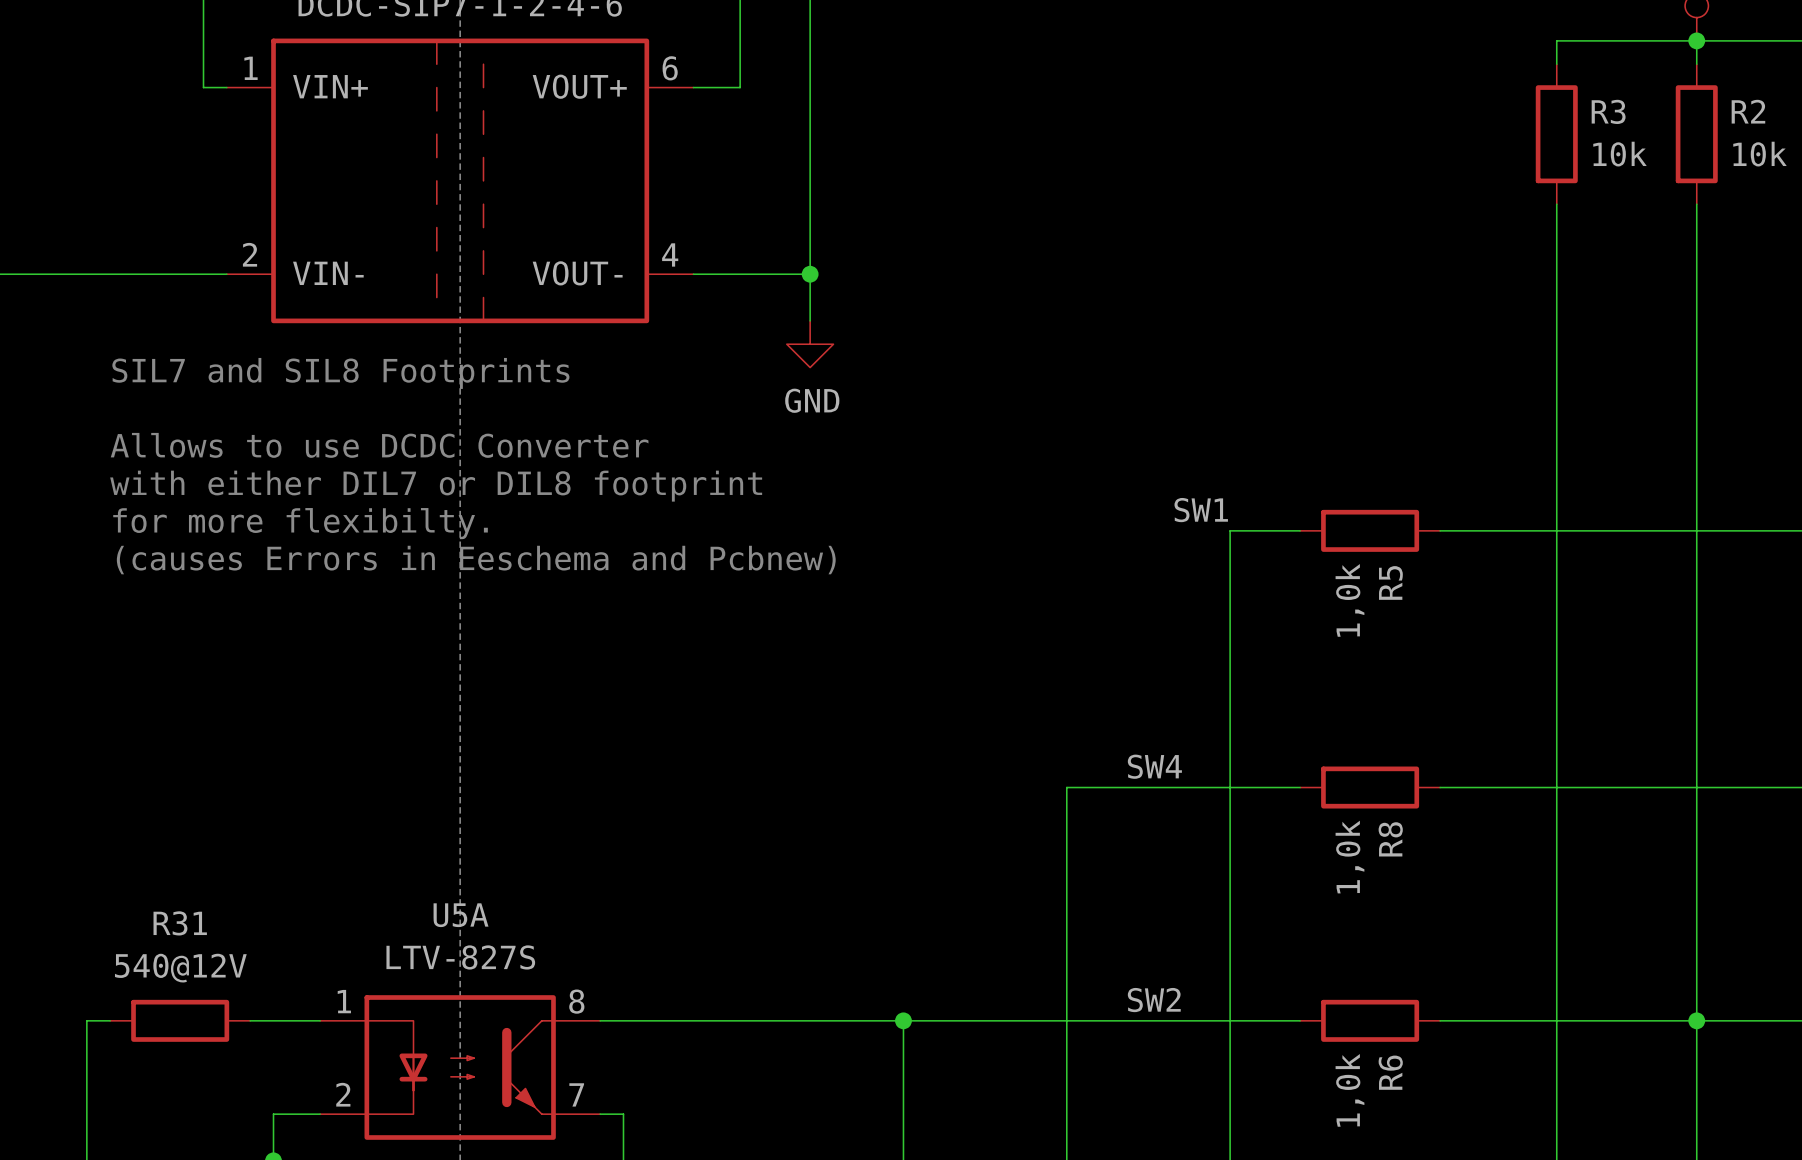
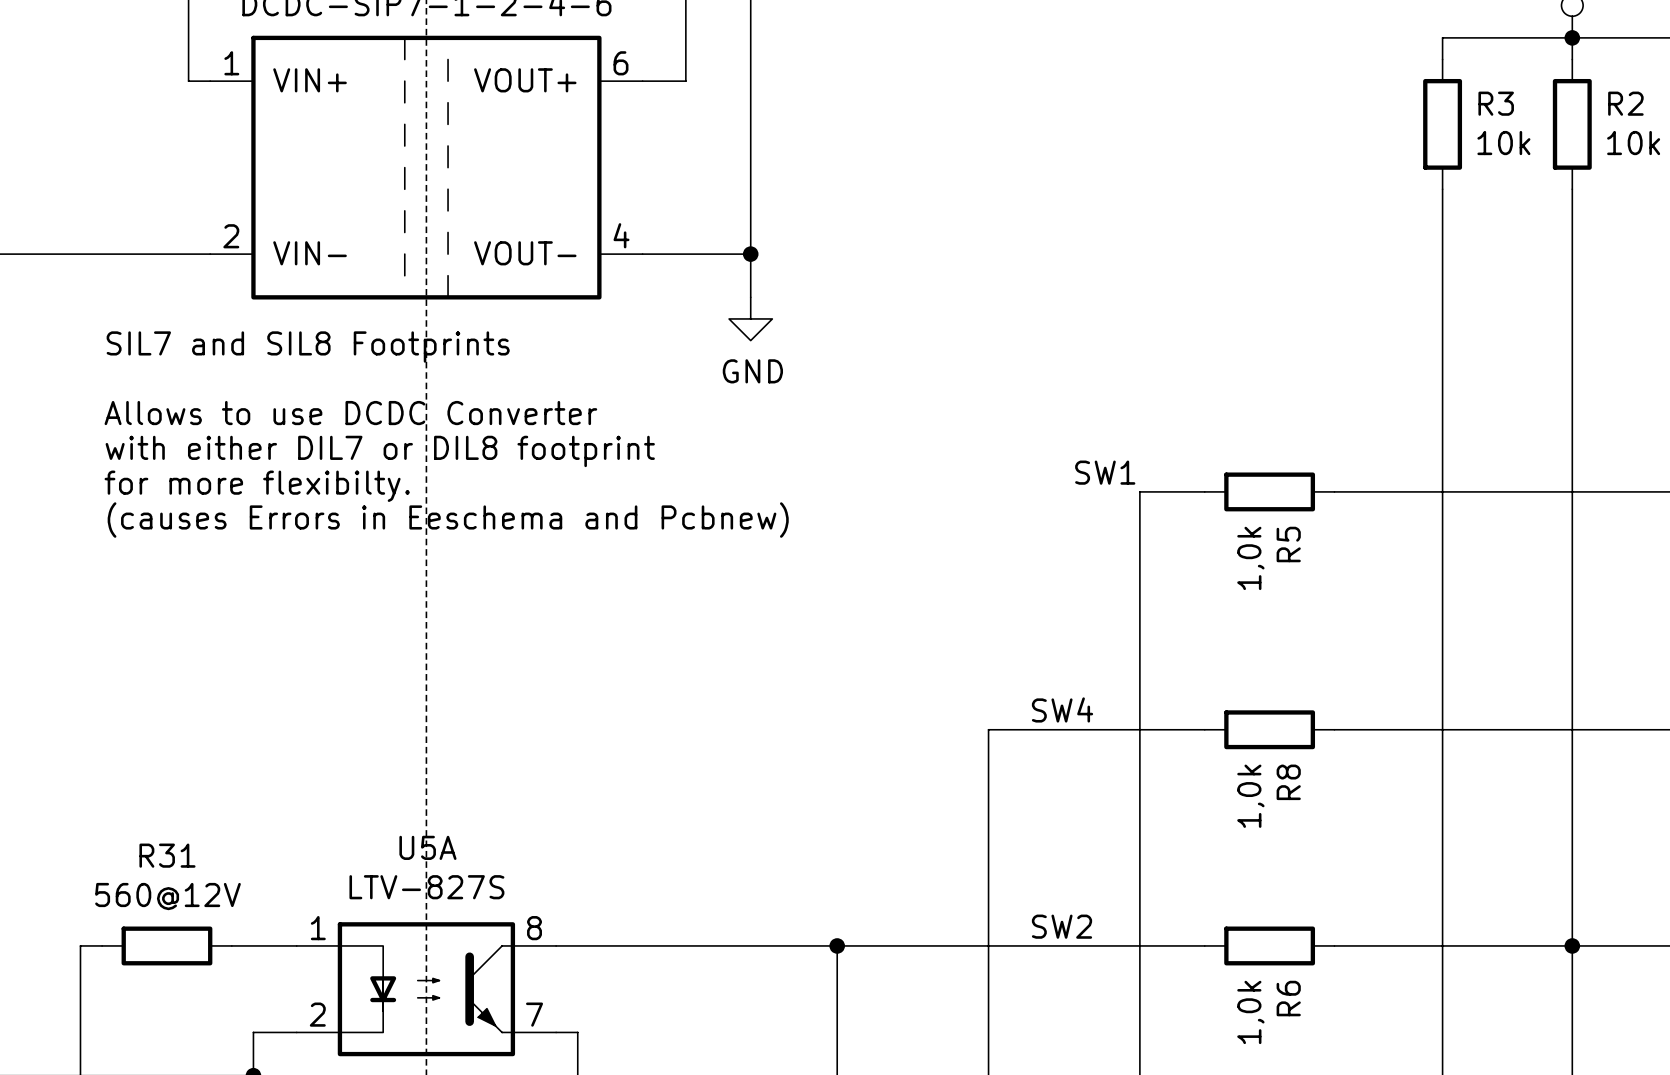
R31 value: 540@12V (180, 968) -> 560@12V (167, 896)

